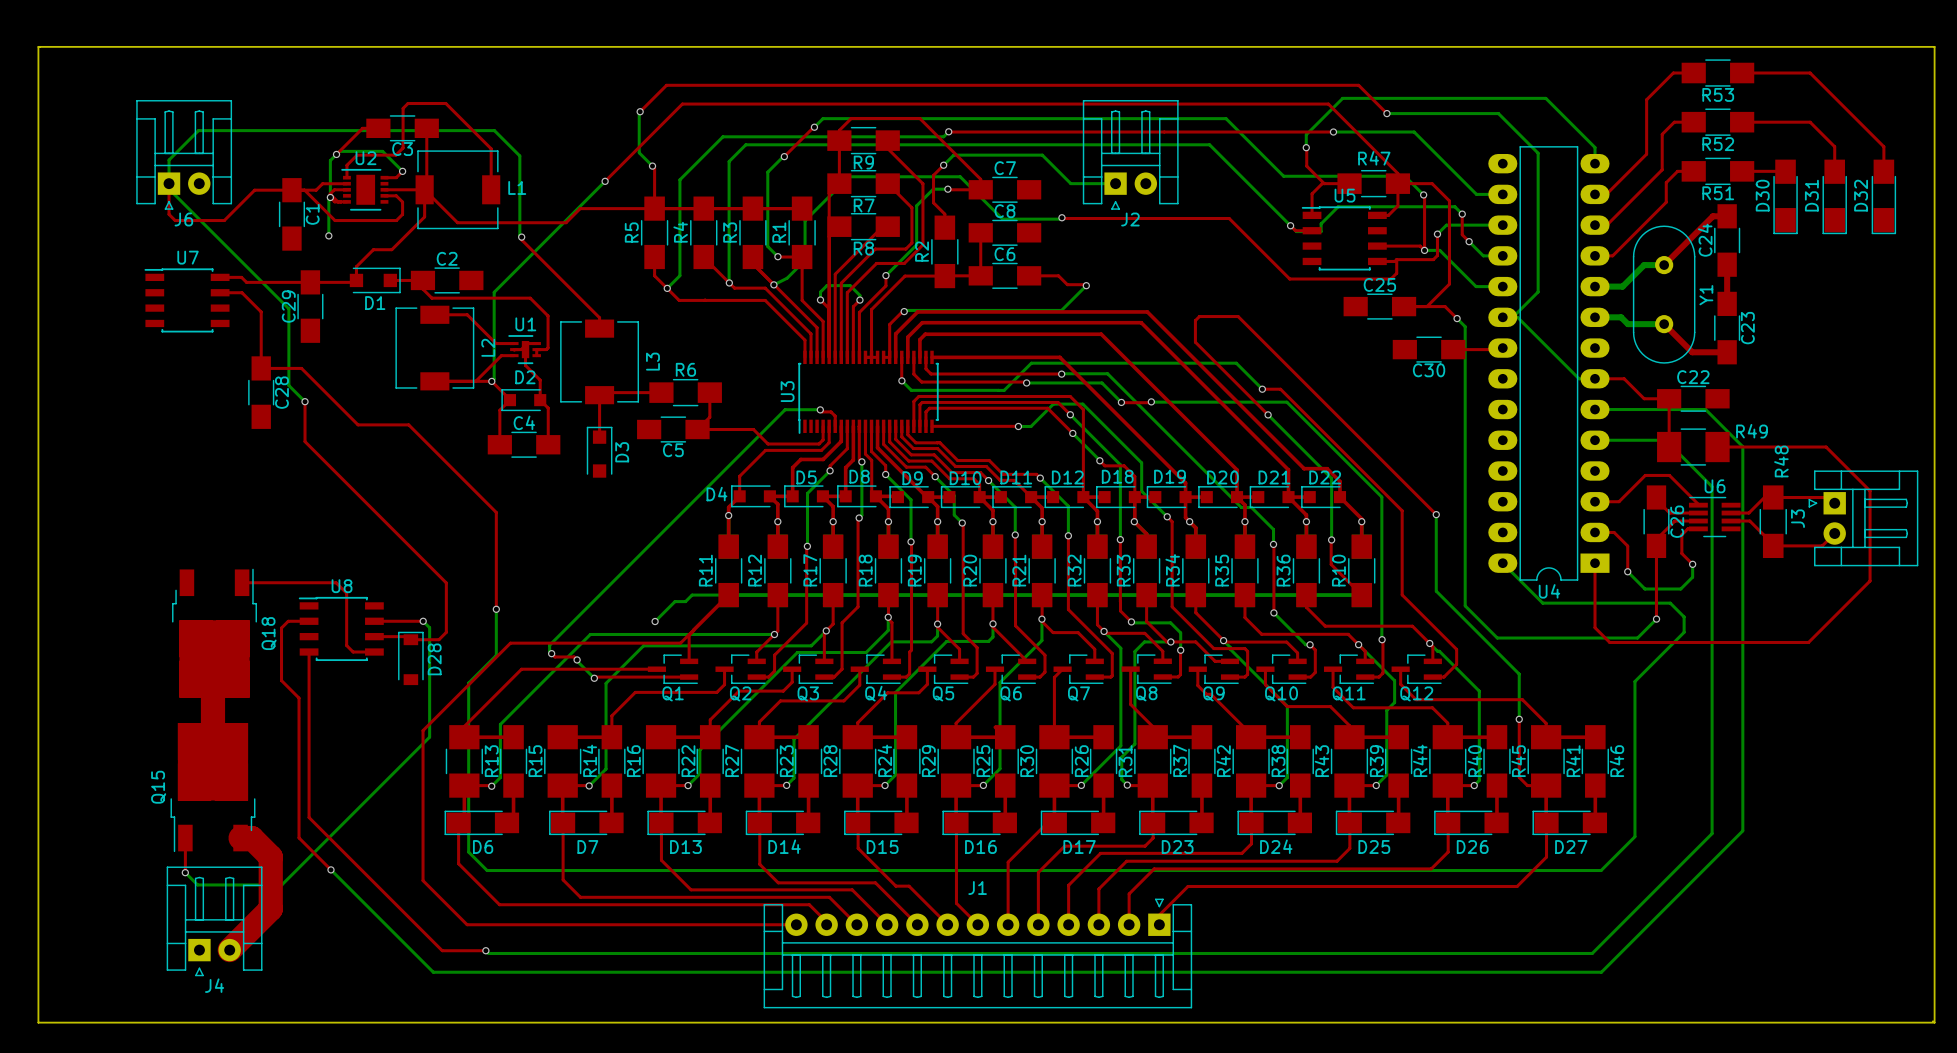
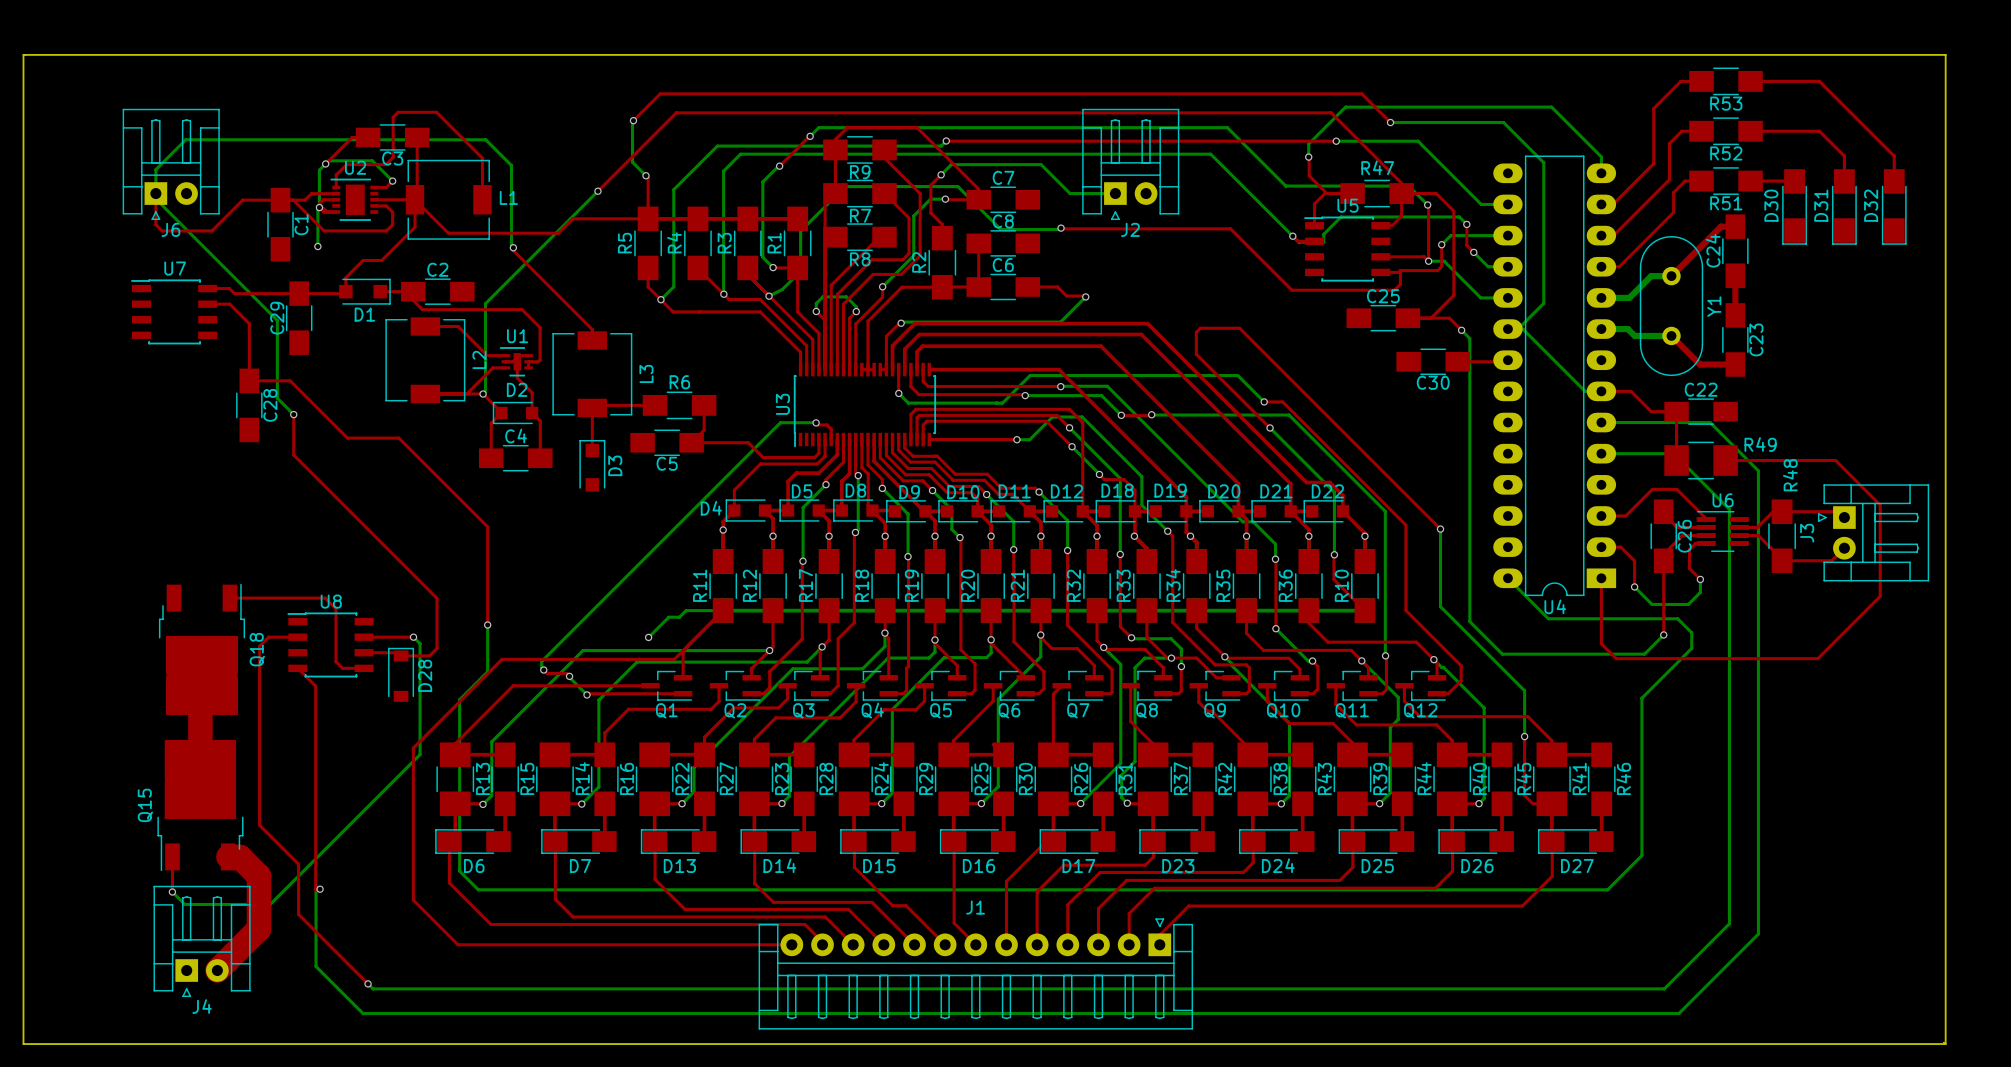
bottom track: (1702, 409) (1705, 409) (1742, 446) (1742, 830) (1601, 972) (433, 972) (330, 869) -> (1710, 422) (1758, 470) (1758, 934) (1678, 1013) (363, 1013) (316, 966) (316, 890)
bottom track: (1665, 440) (1712, 486) (1712, 833) (1592, 953) (488, 953) (485, 950) -> (1673, 453) (1729, 509) (1729, 923) (1664, 988) (373, 988) (368, 983)
top track: (288, 621) (281, 628) (281, 680) (299, 698) (299, 837) (330, 869) -> (276, 637) (268, 637) (259, 646) (259, 825) (298, 864) (298, 914) (368, 983)
top track: (309, 652) (309, 817) (442, 950) (485, 950) -> (297, 668) (315, 686) (316, 890)
via: (485, 950) -> none
via: none -> (368, 983)

